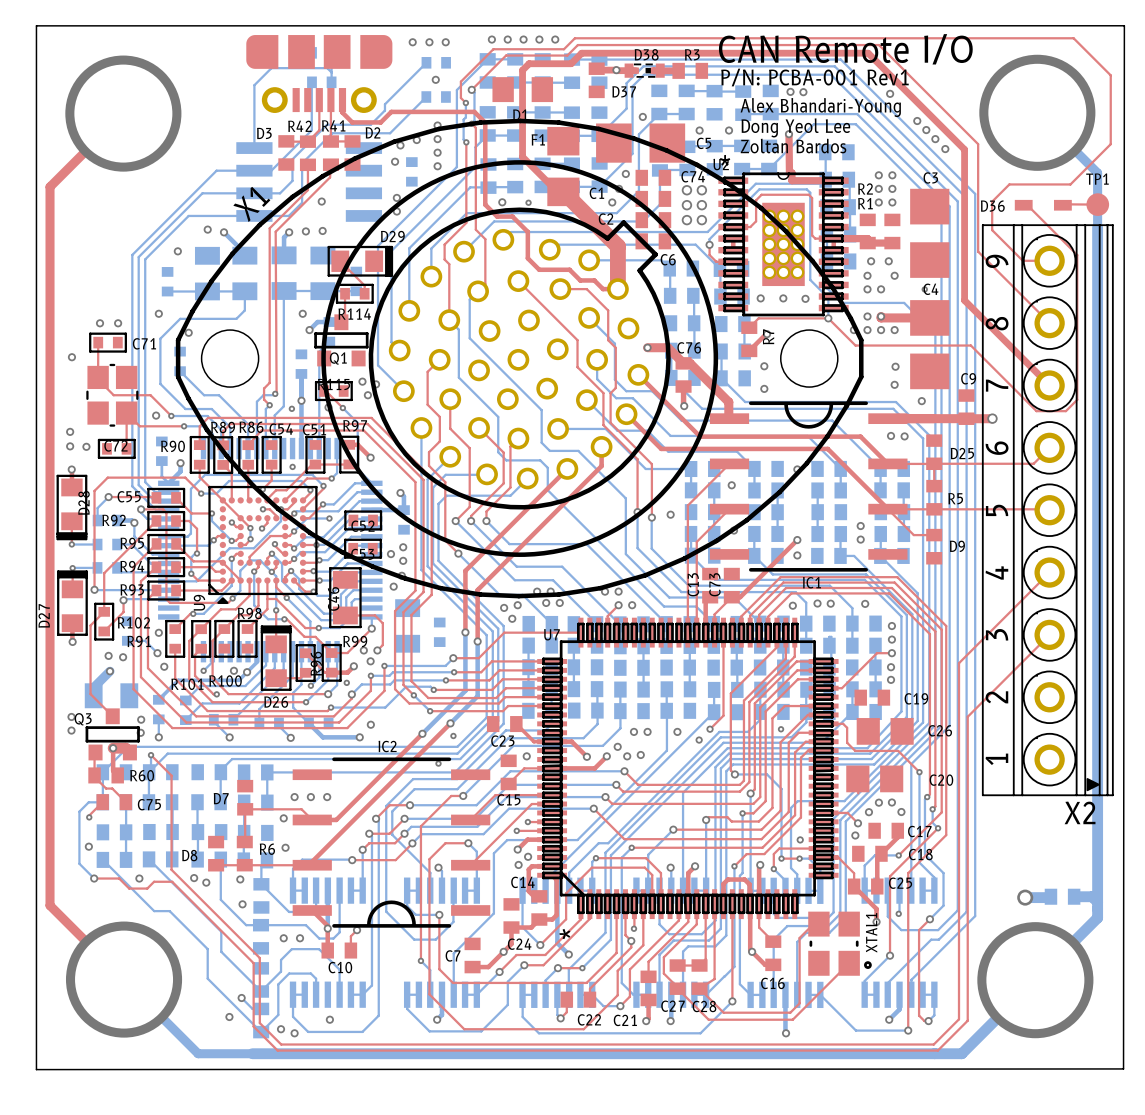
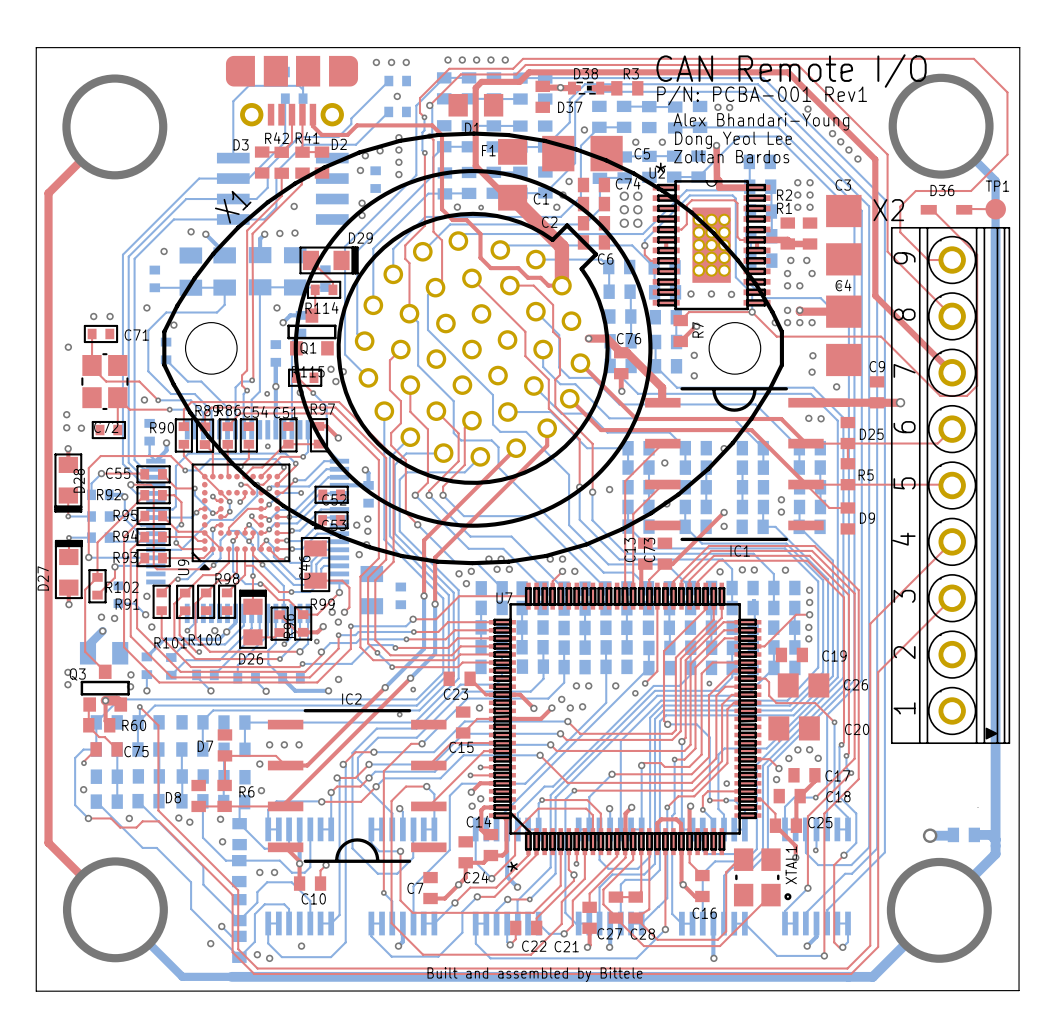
D36 name position: D36 (992, 206) -> D36 (942, 190)
X2 name position: X2 (1080, 812) -> X2 (888, 210)
text: none -> Built and assembled by Bittele (534, 974)

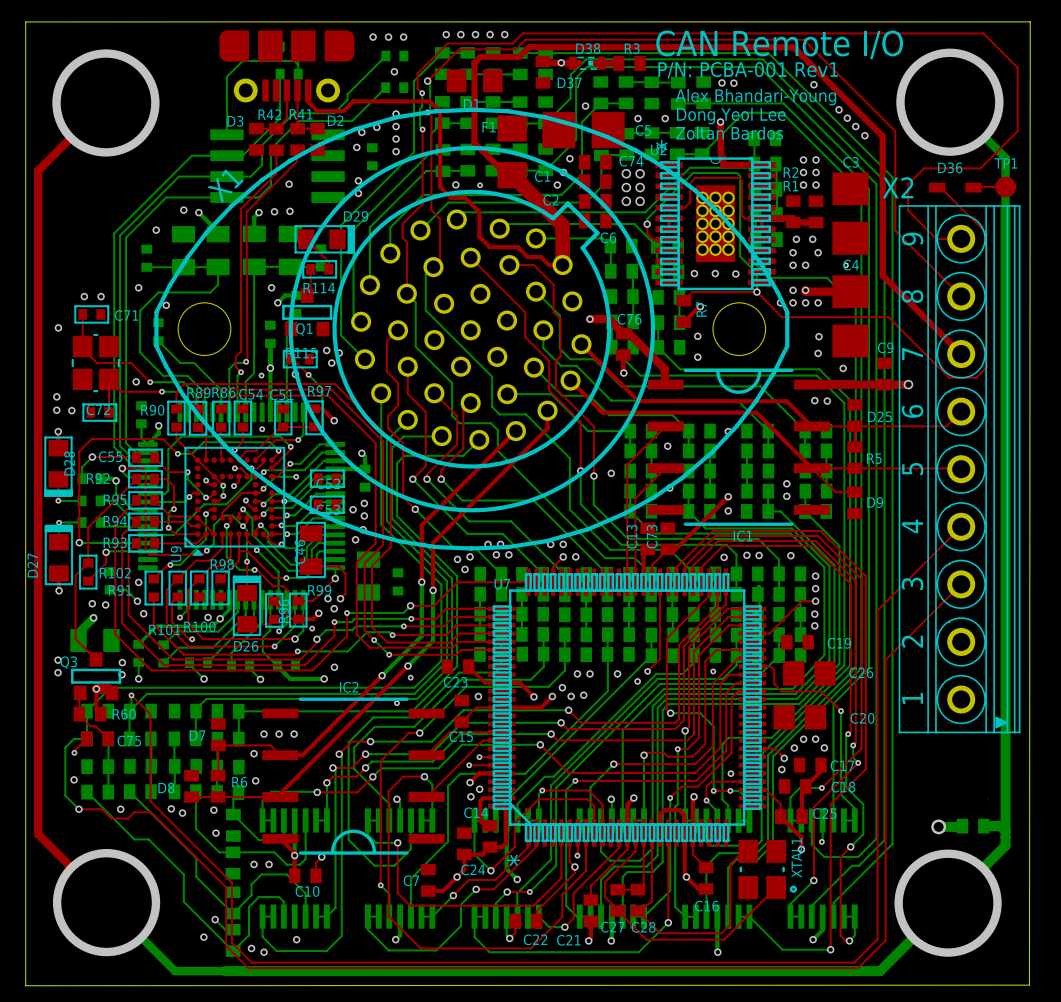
text: Built and assembled by Bittele (534, 974) -> none

